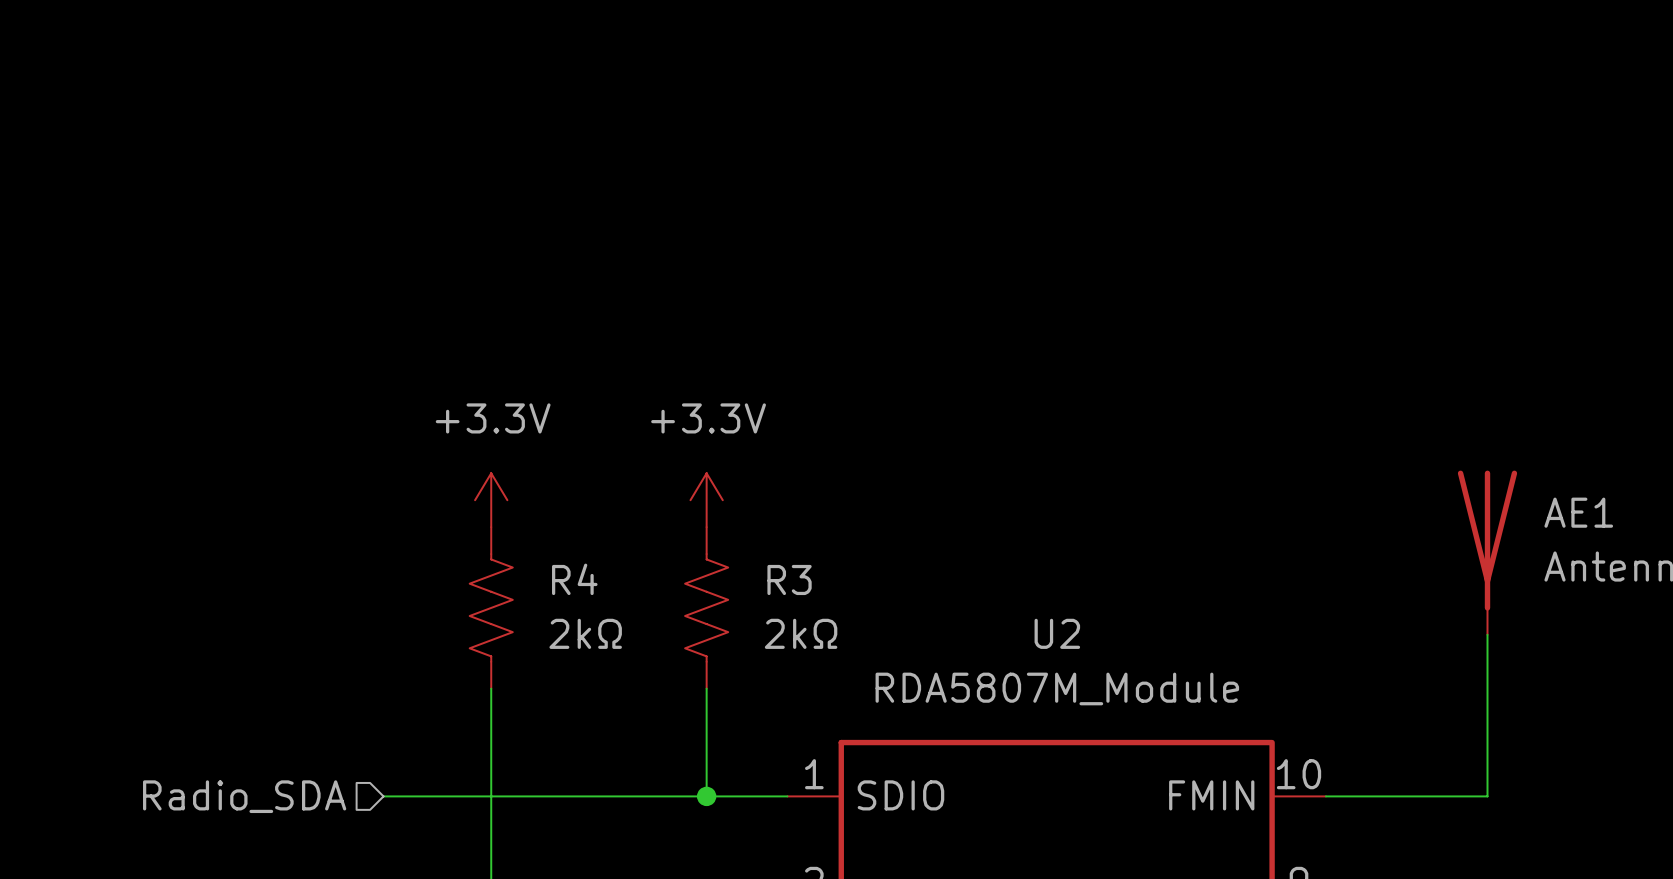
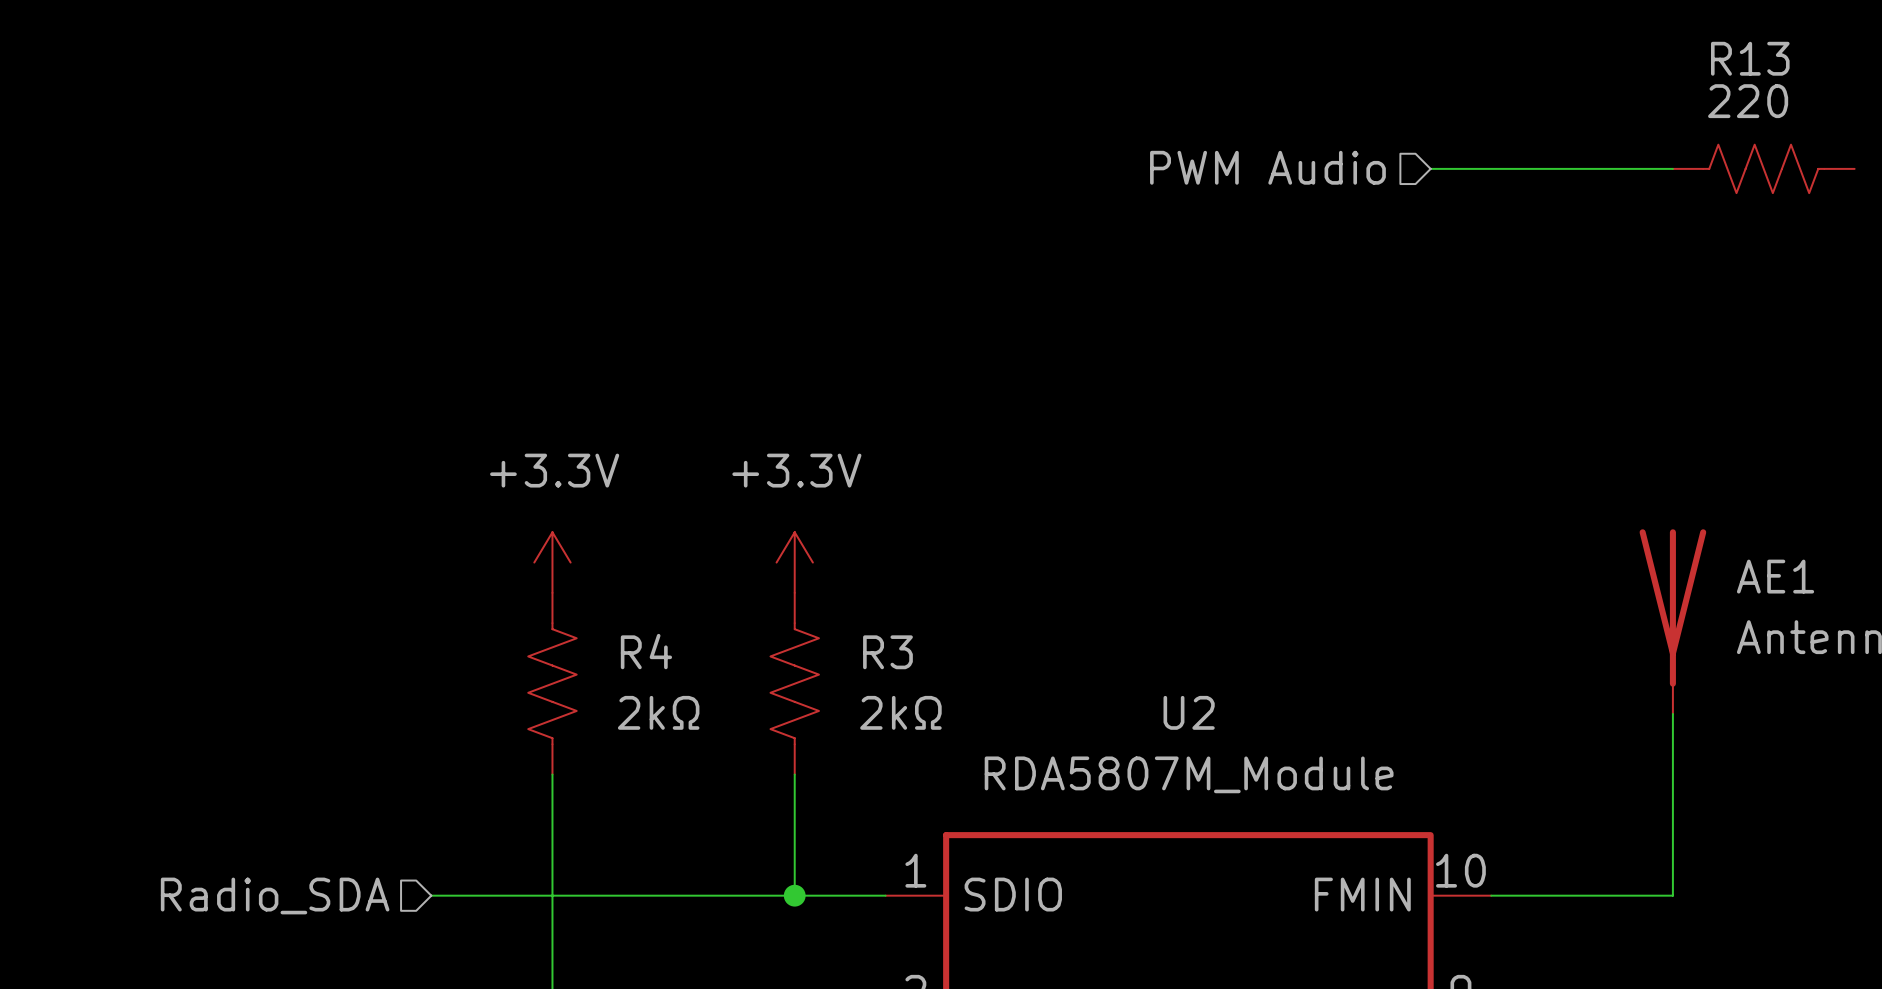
hierarchical label: none -> PWM Audio (1267, 167)
wire: none -> (1430, 168) (1672, 168)
R13: none -> 220 (1763, 168)

